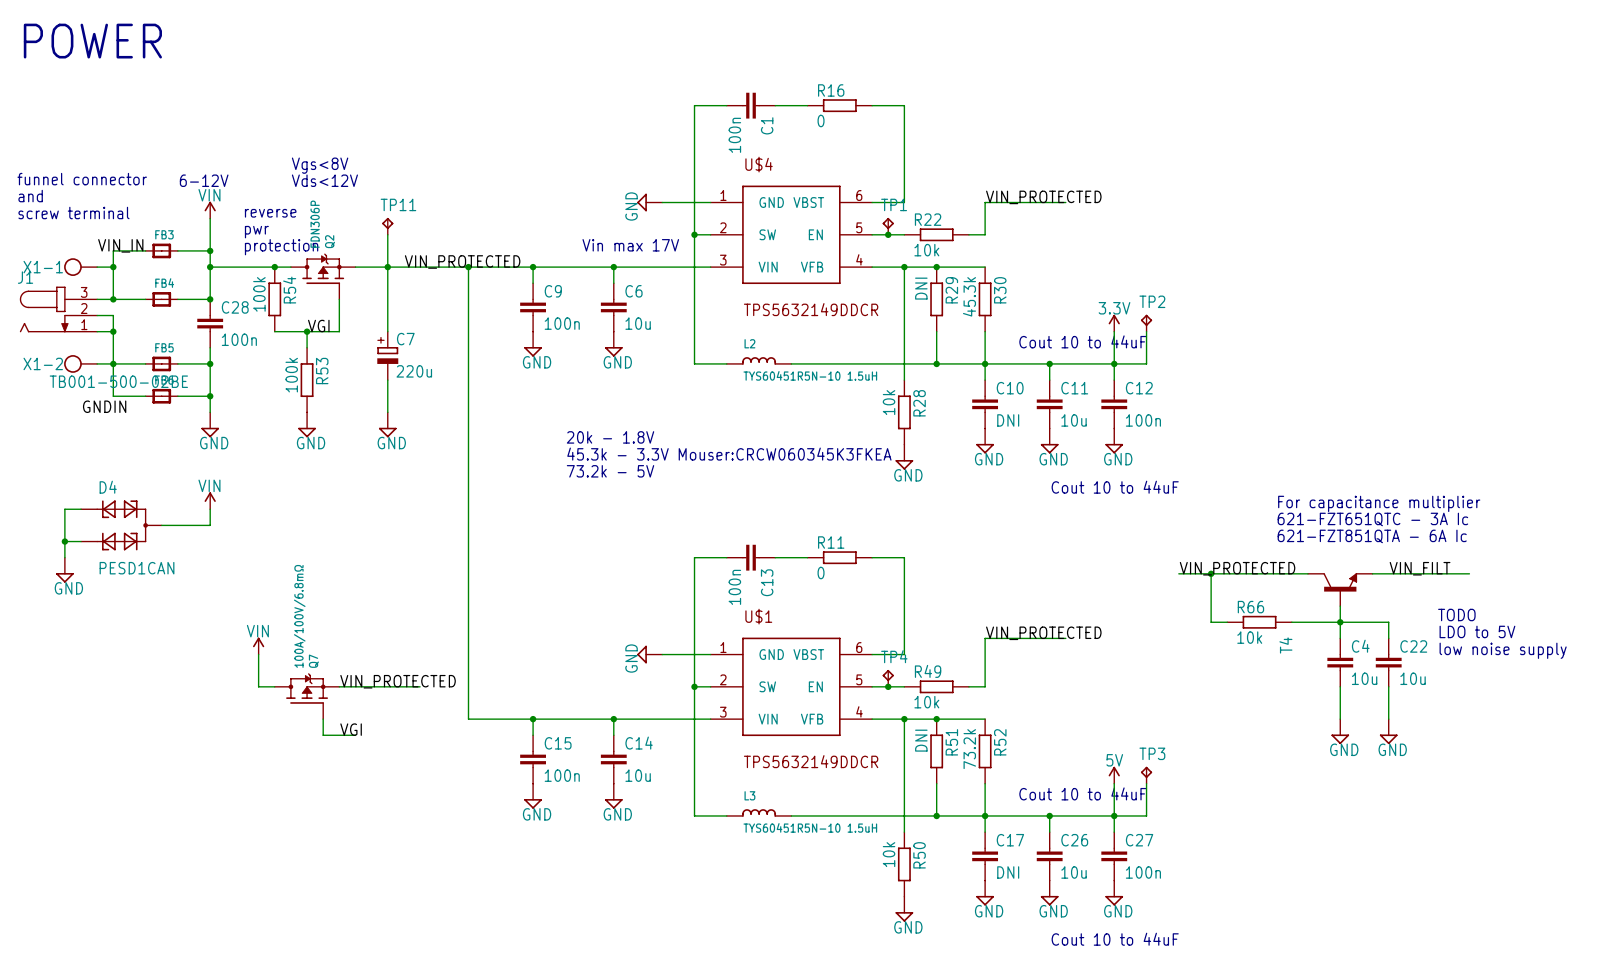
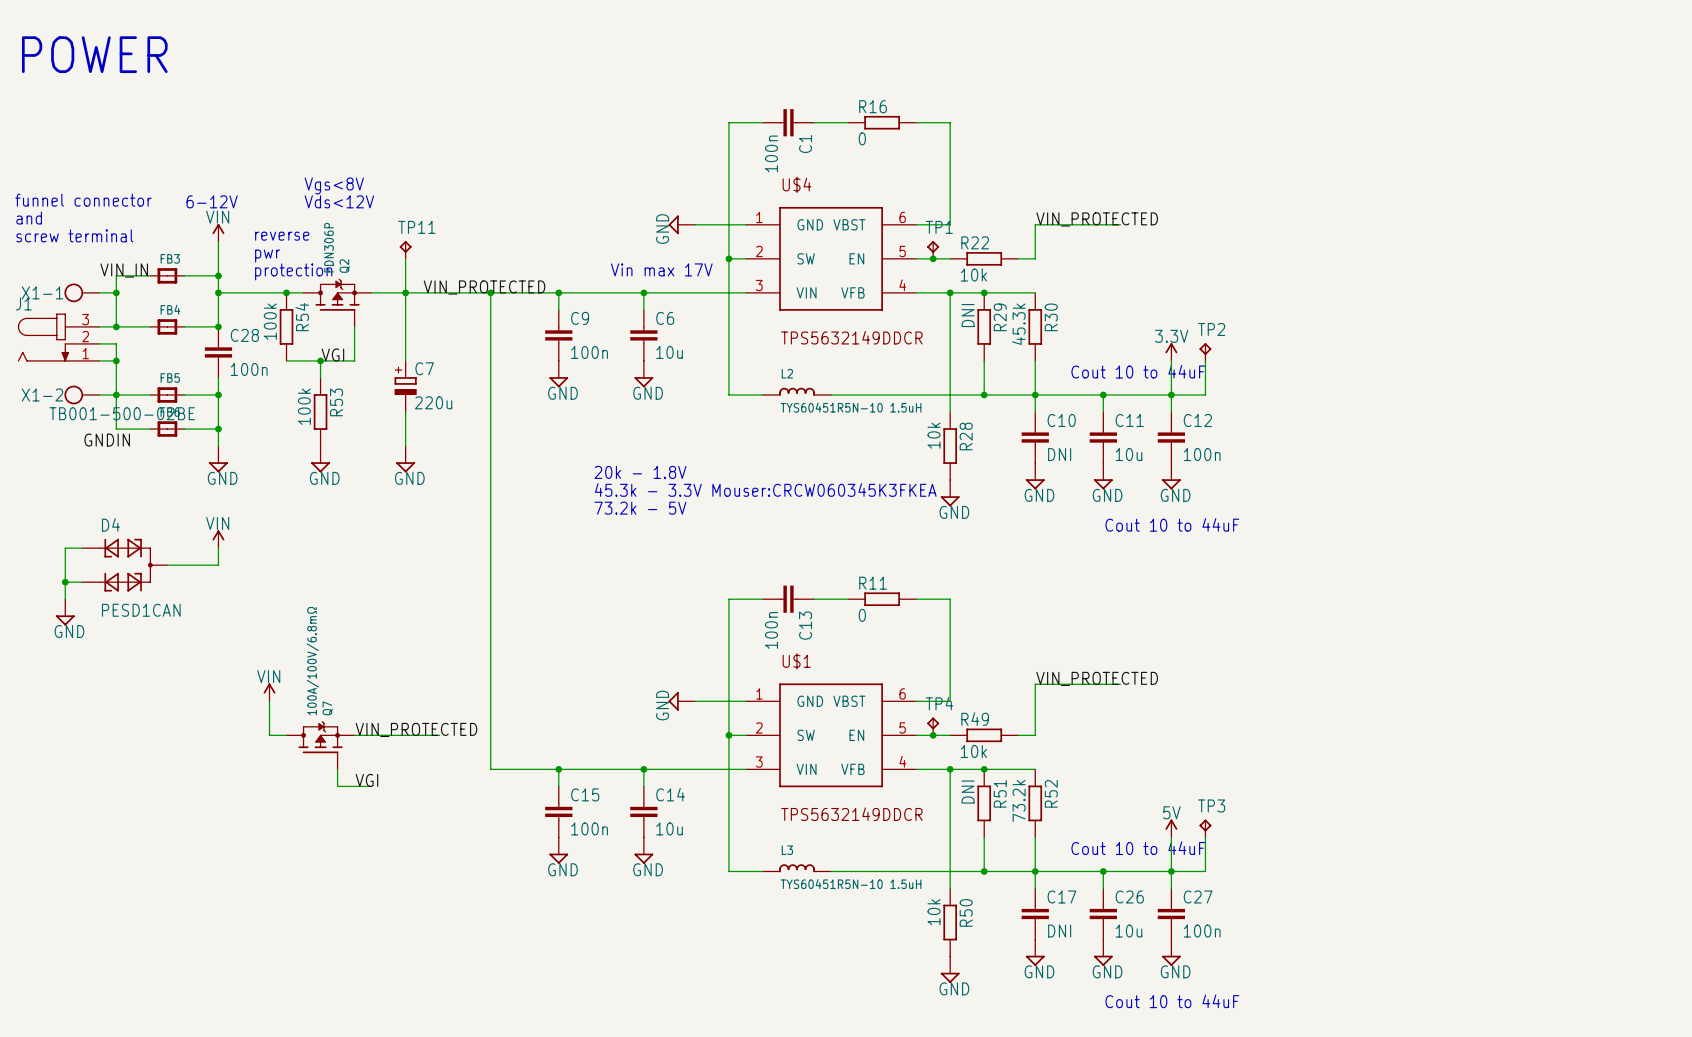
text: For capacitance multiplier (1379, 503) -> none
text: 621-FZT651QTC - 3A Ic (1372, 519) -> none
text: 621-FZT851QTA - 6A Ic (1372, 536) -> none
label: VIN_PROTECTED (1237, 568) -> none
label: VIN_FILT (1420, 568) -> none
wire: (1178, 573) (1307, 573) -> none
wire: (1211, 573) (1211, 622) (1227, 622) -> none
junction: (1211, 573) -> none
wire: (1372, 573) (1469, 573) -> none
T4: (1340, 589) -> none
wire: (1340, 606) (1340, 638) -> none
text: TODO (1456, 615) -> none
R66: 10k (1259, 622) -> none
wire: (1291, 622) (1388, 622) (1388, 638) -> none
junction: (1340, 622) -> none
text: LDO to 5V (1477, 631) -> none
text: low noise supply (1503, 650) -> none
C4: 10u (1340, 662) -> none
C22: 10u (1388, 662) -> none
wire: (1340, 686) (1340, 719) -> none
wire: (1388, 686) (1388, 719) -> none
power symbol: GND (1340, 731) -> none
power symbol: GND (1388, 731) -> none

